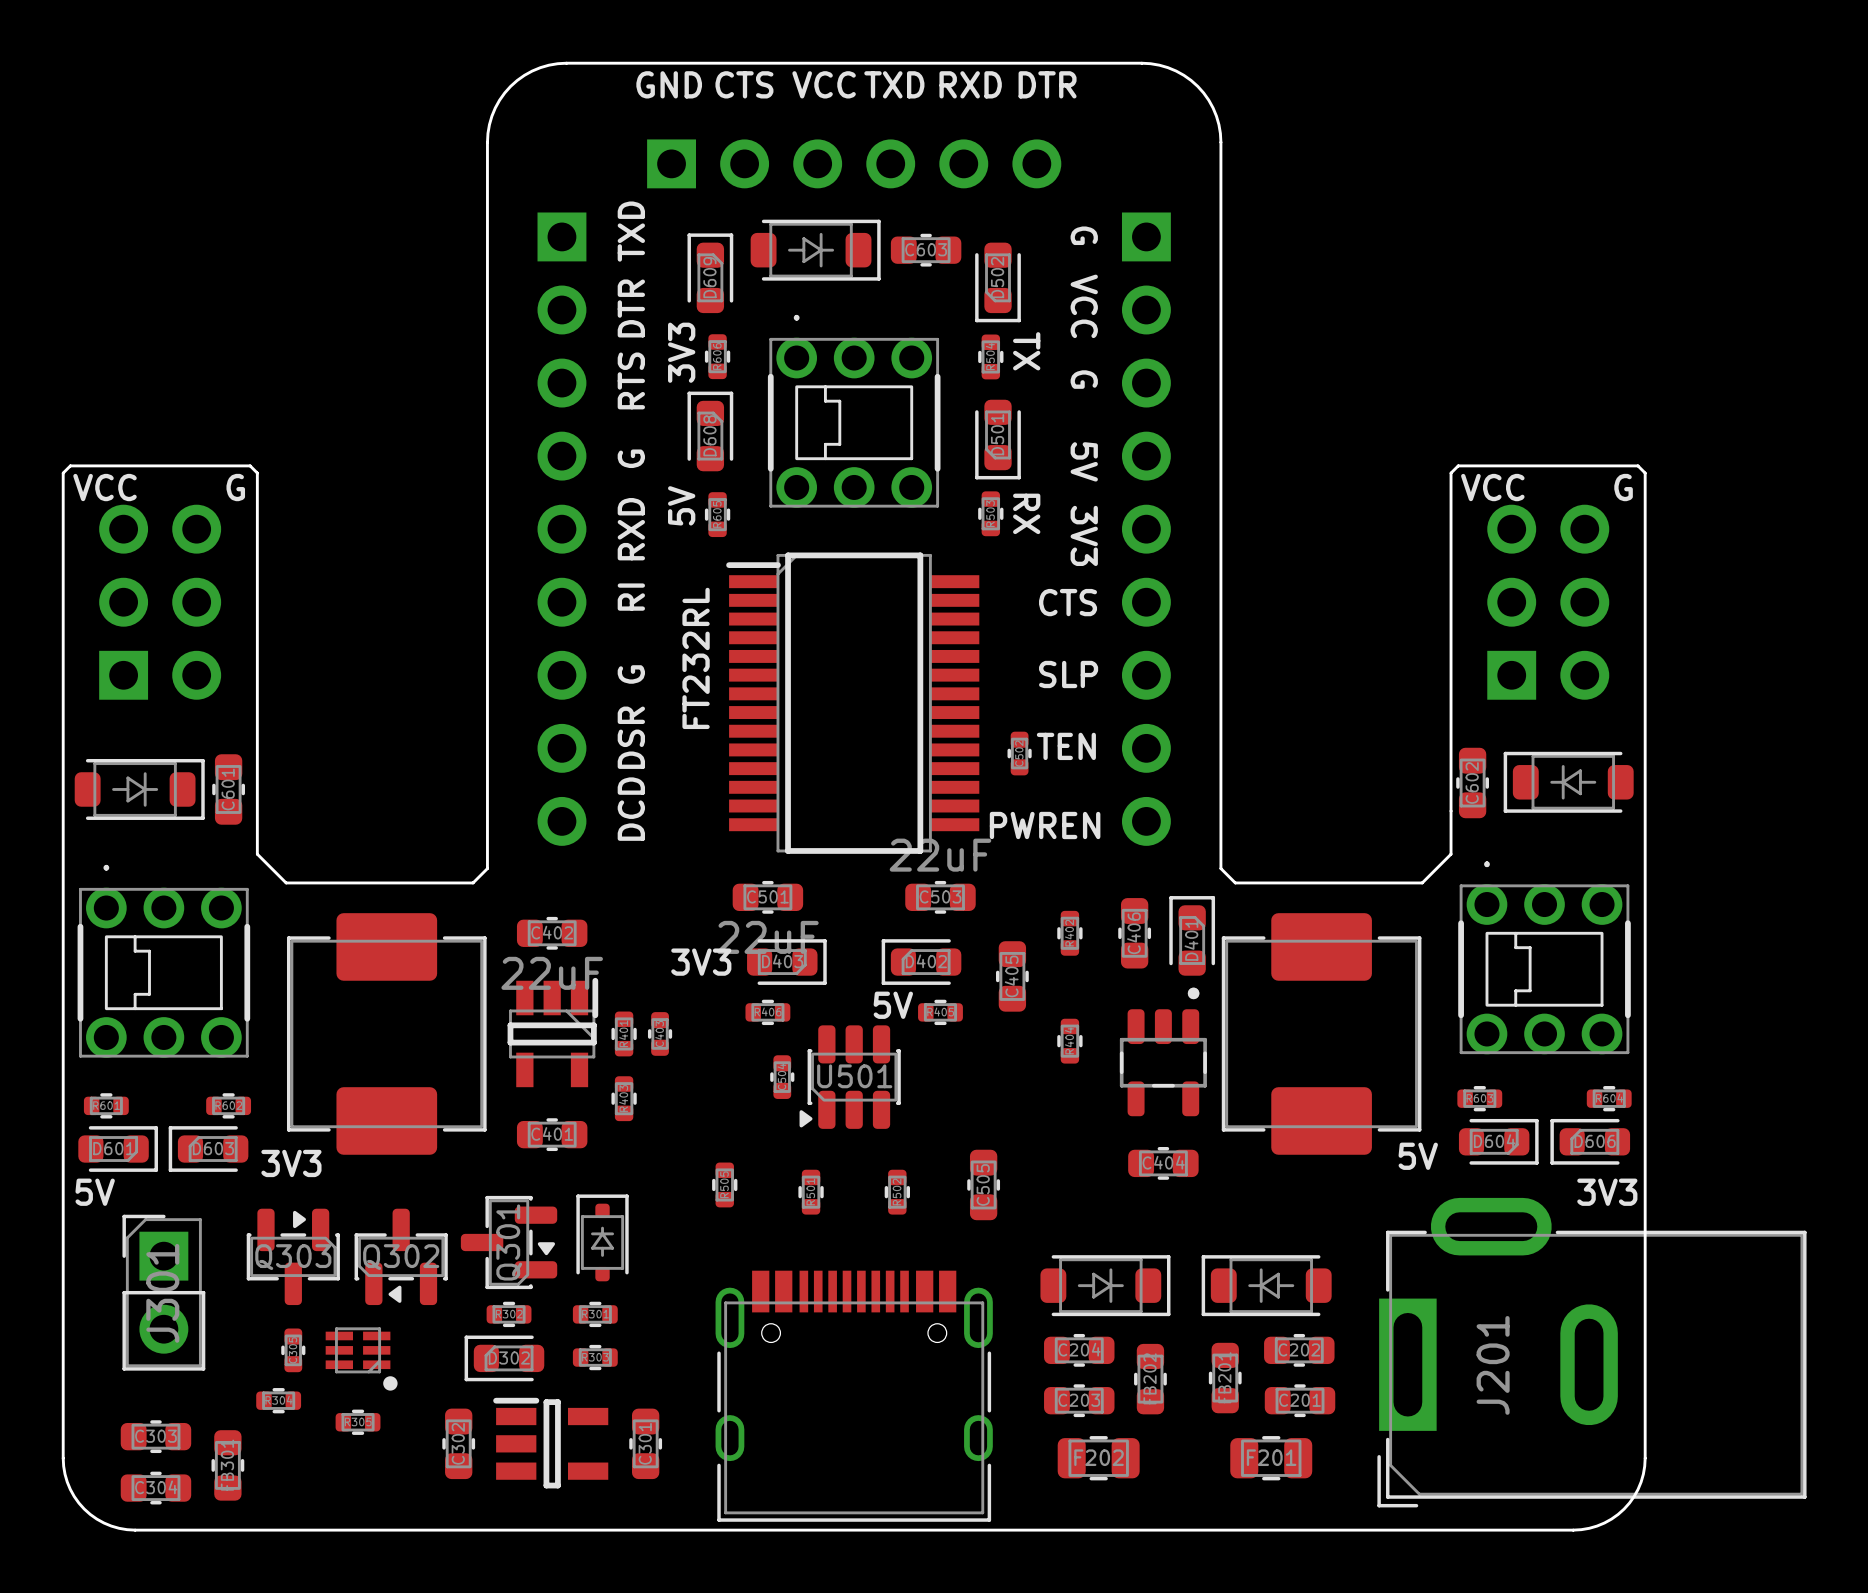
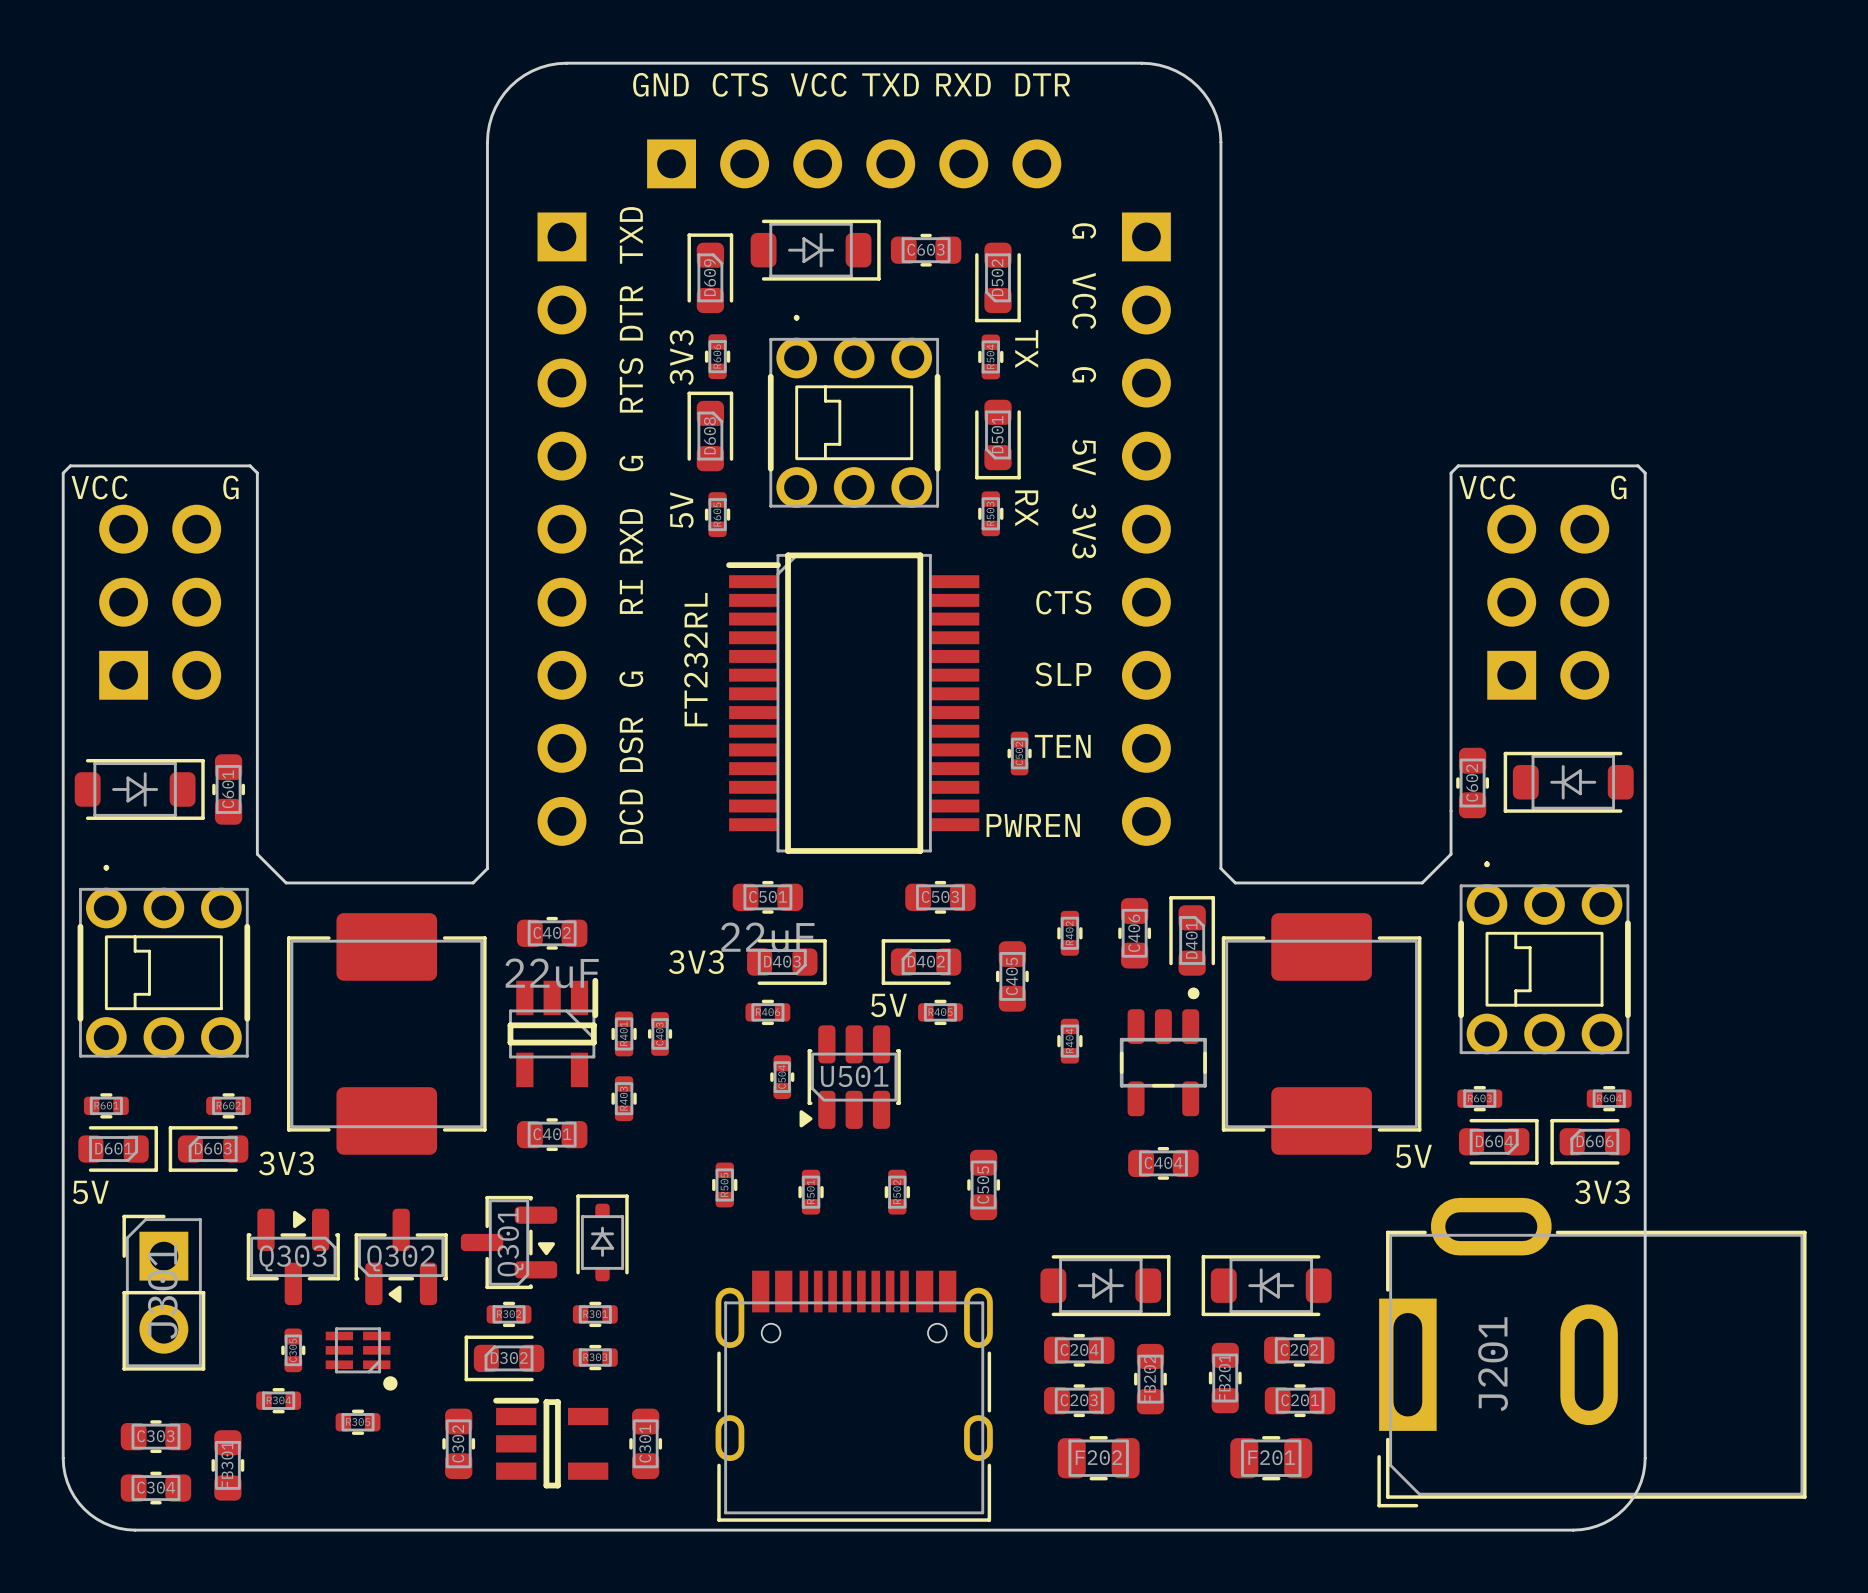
C503 value: 22uF (940, 855) -> none

